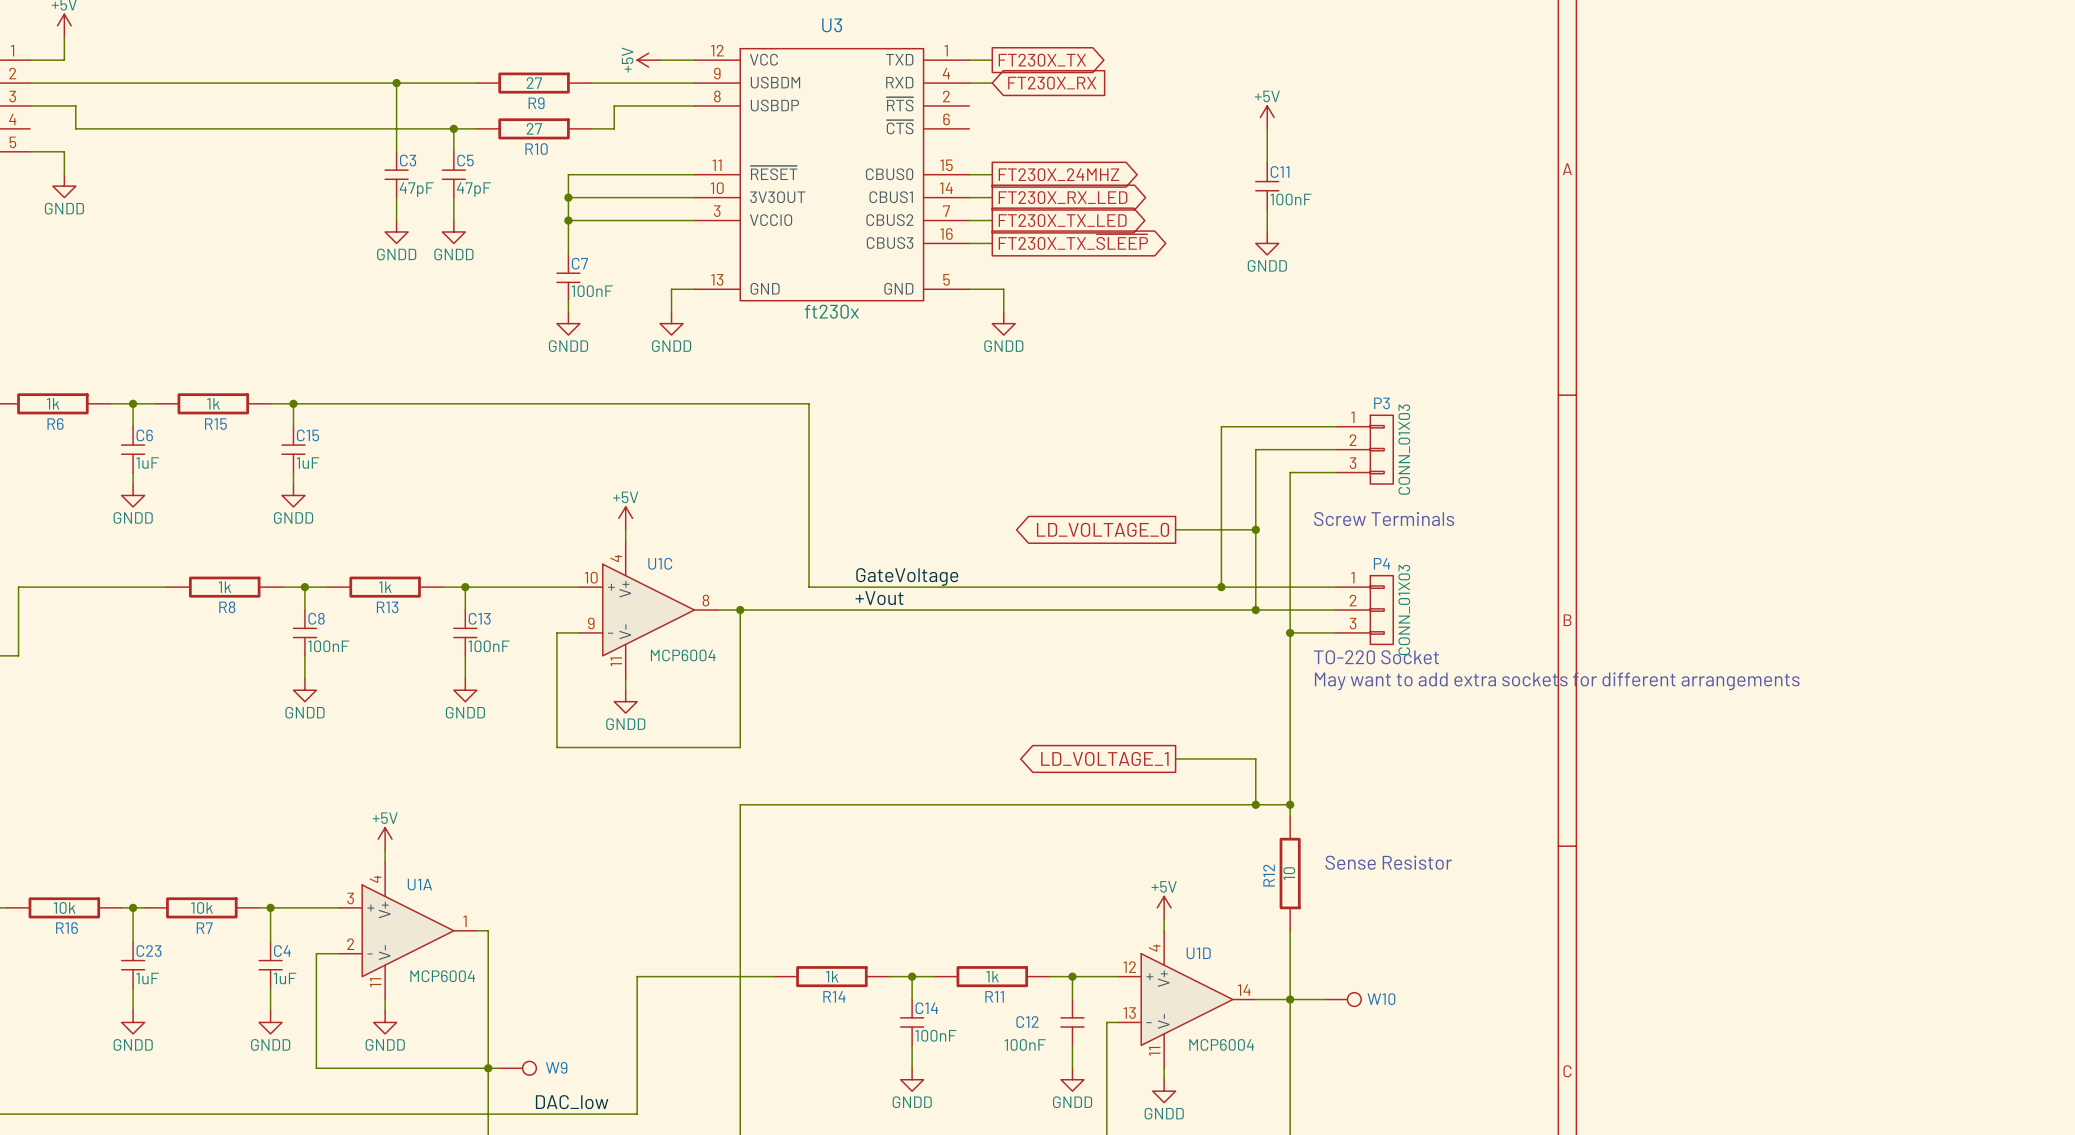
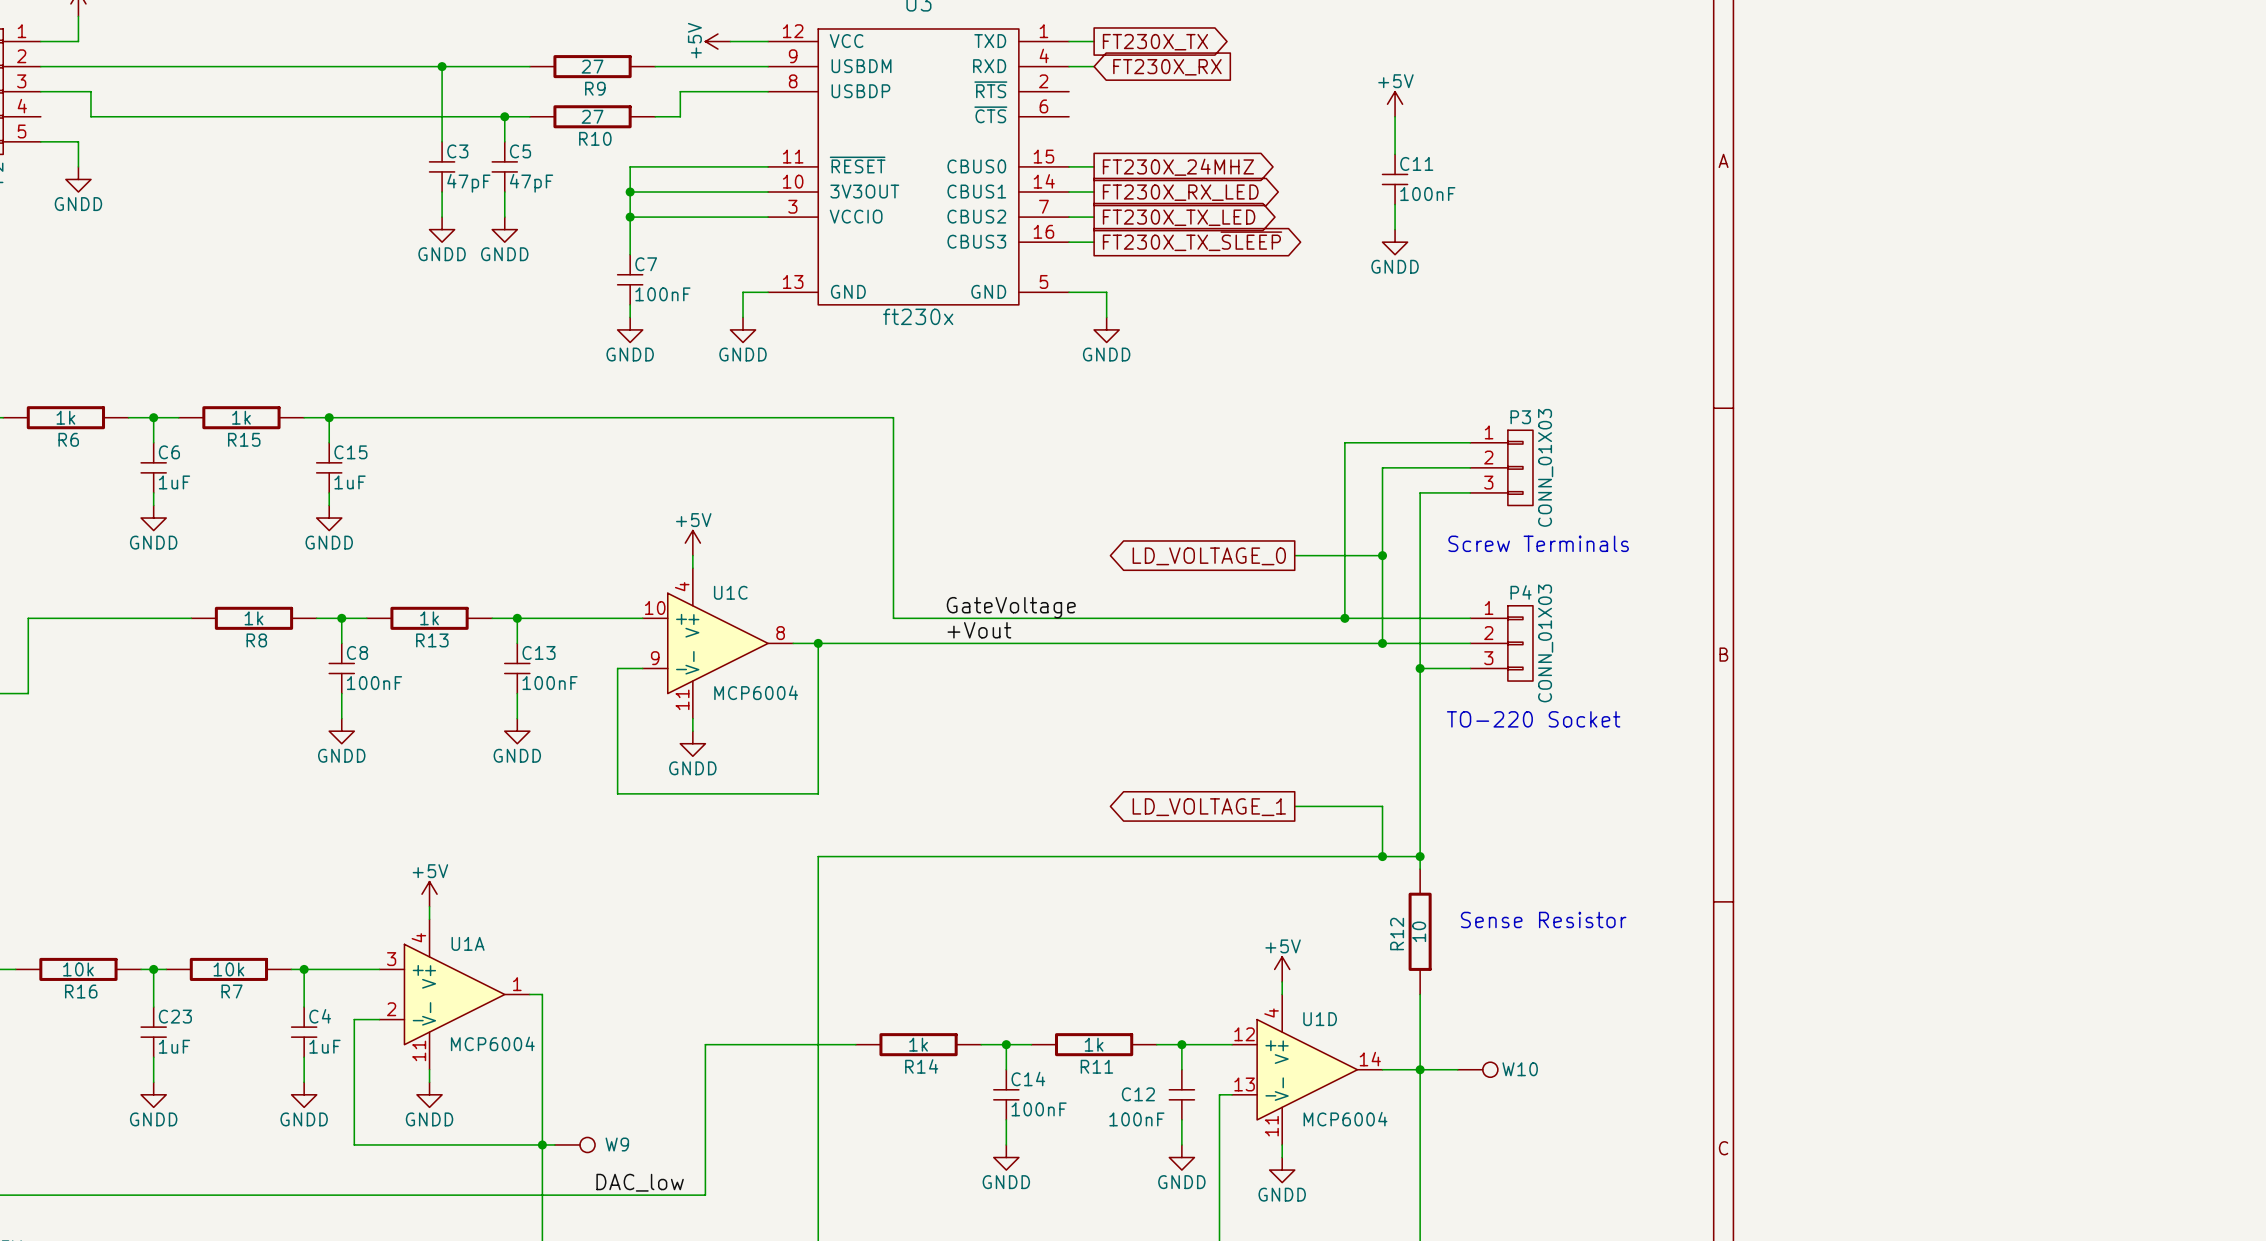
text: TO-220 Socket (1376, 657) -> none
text: May want to add extra sockets for different arrangements (1557, 681) -> TO-220 Socket (1533, 719)

